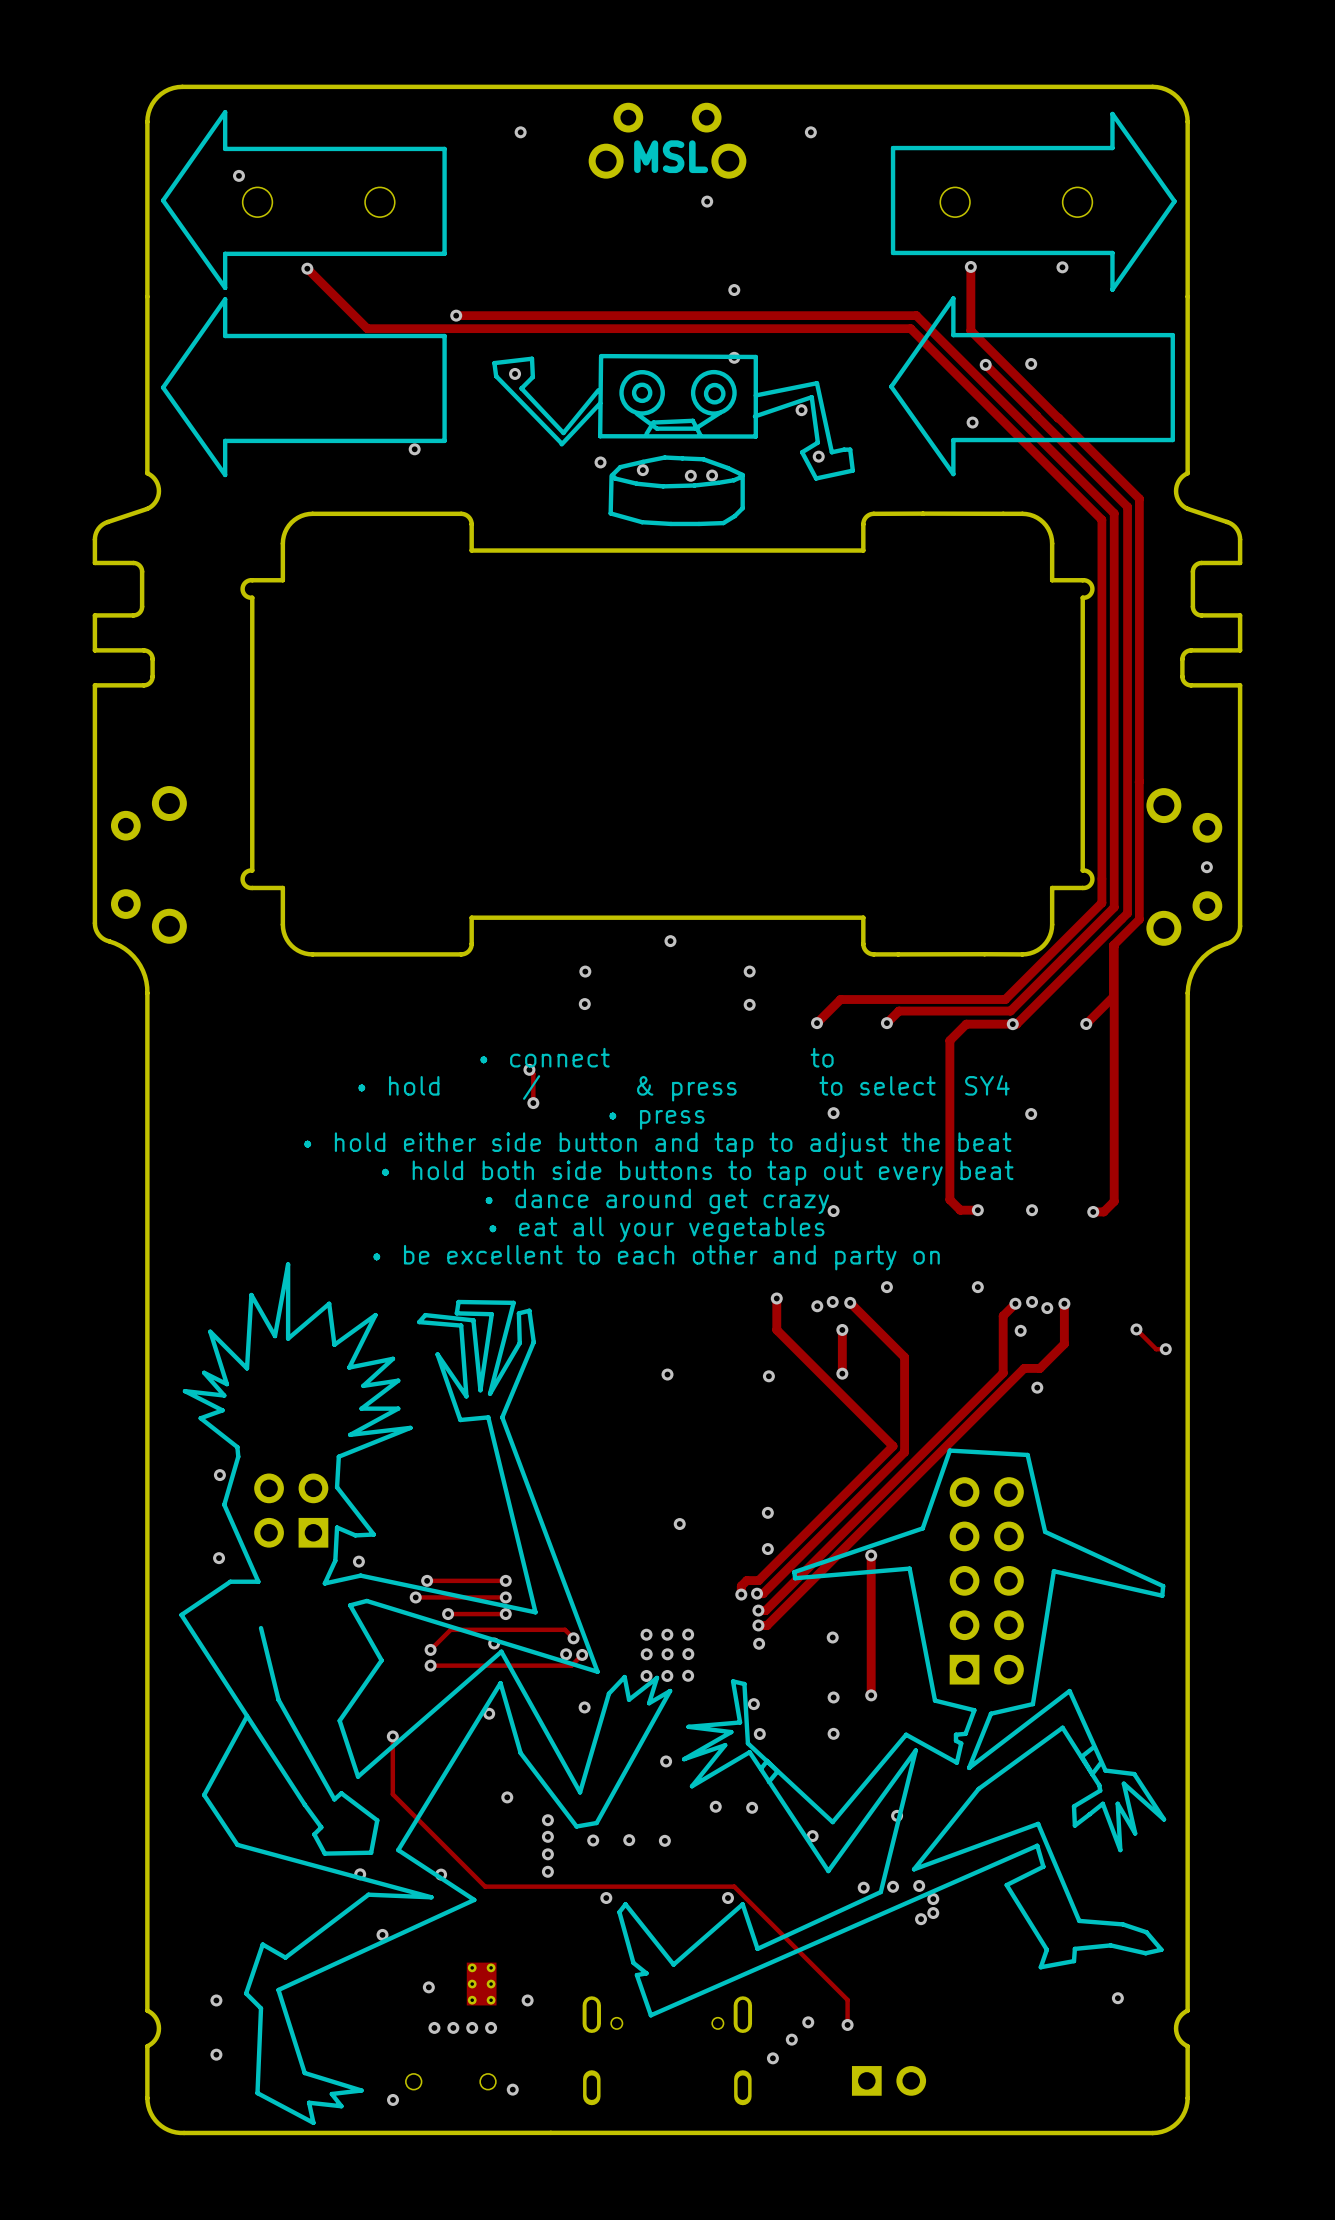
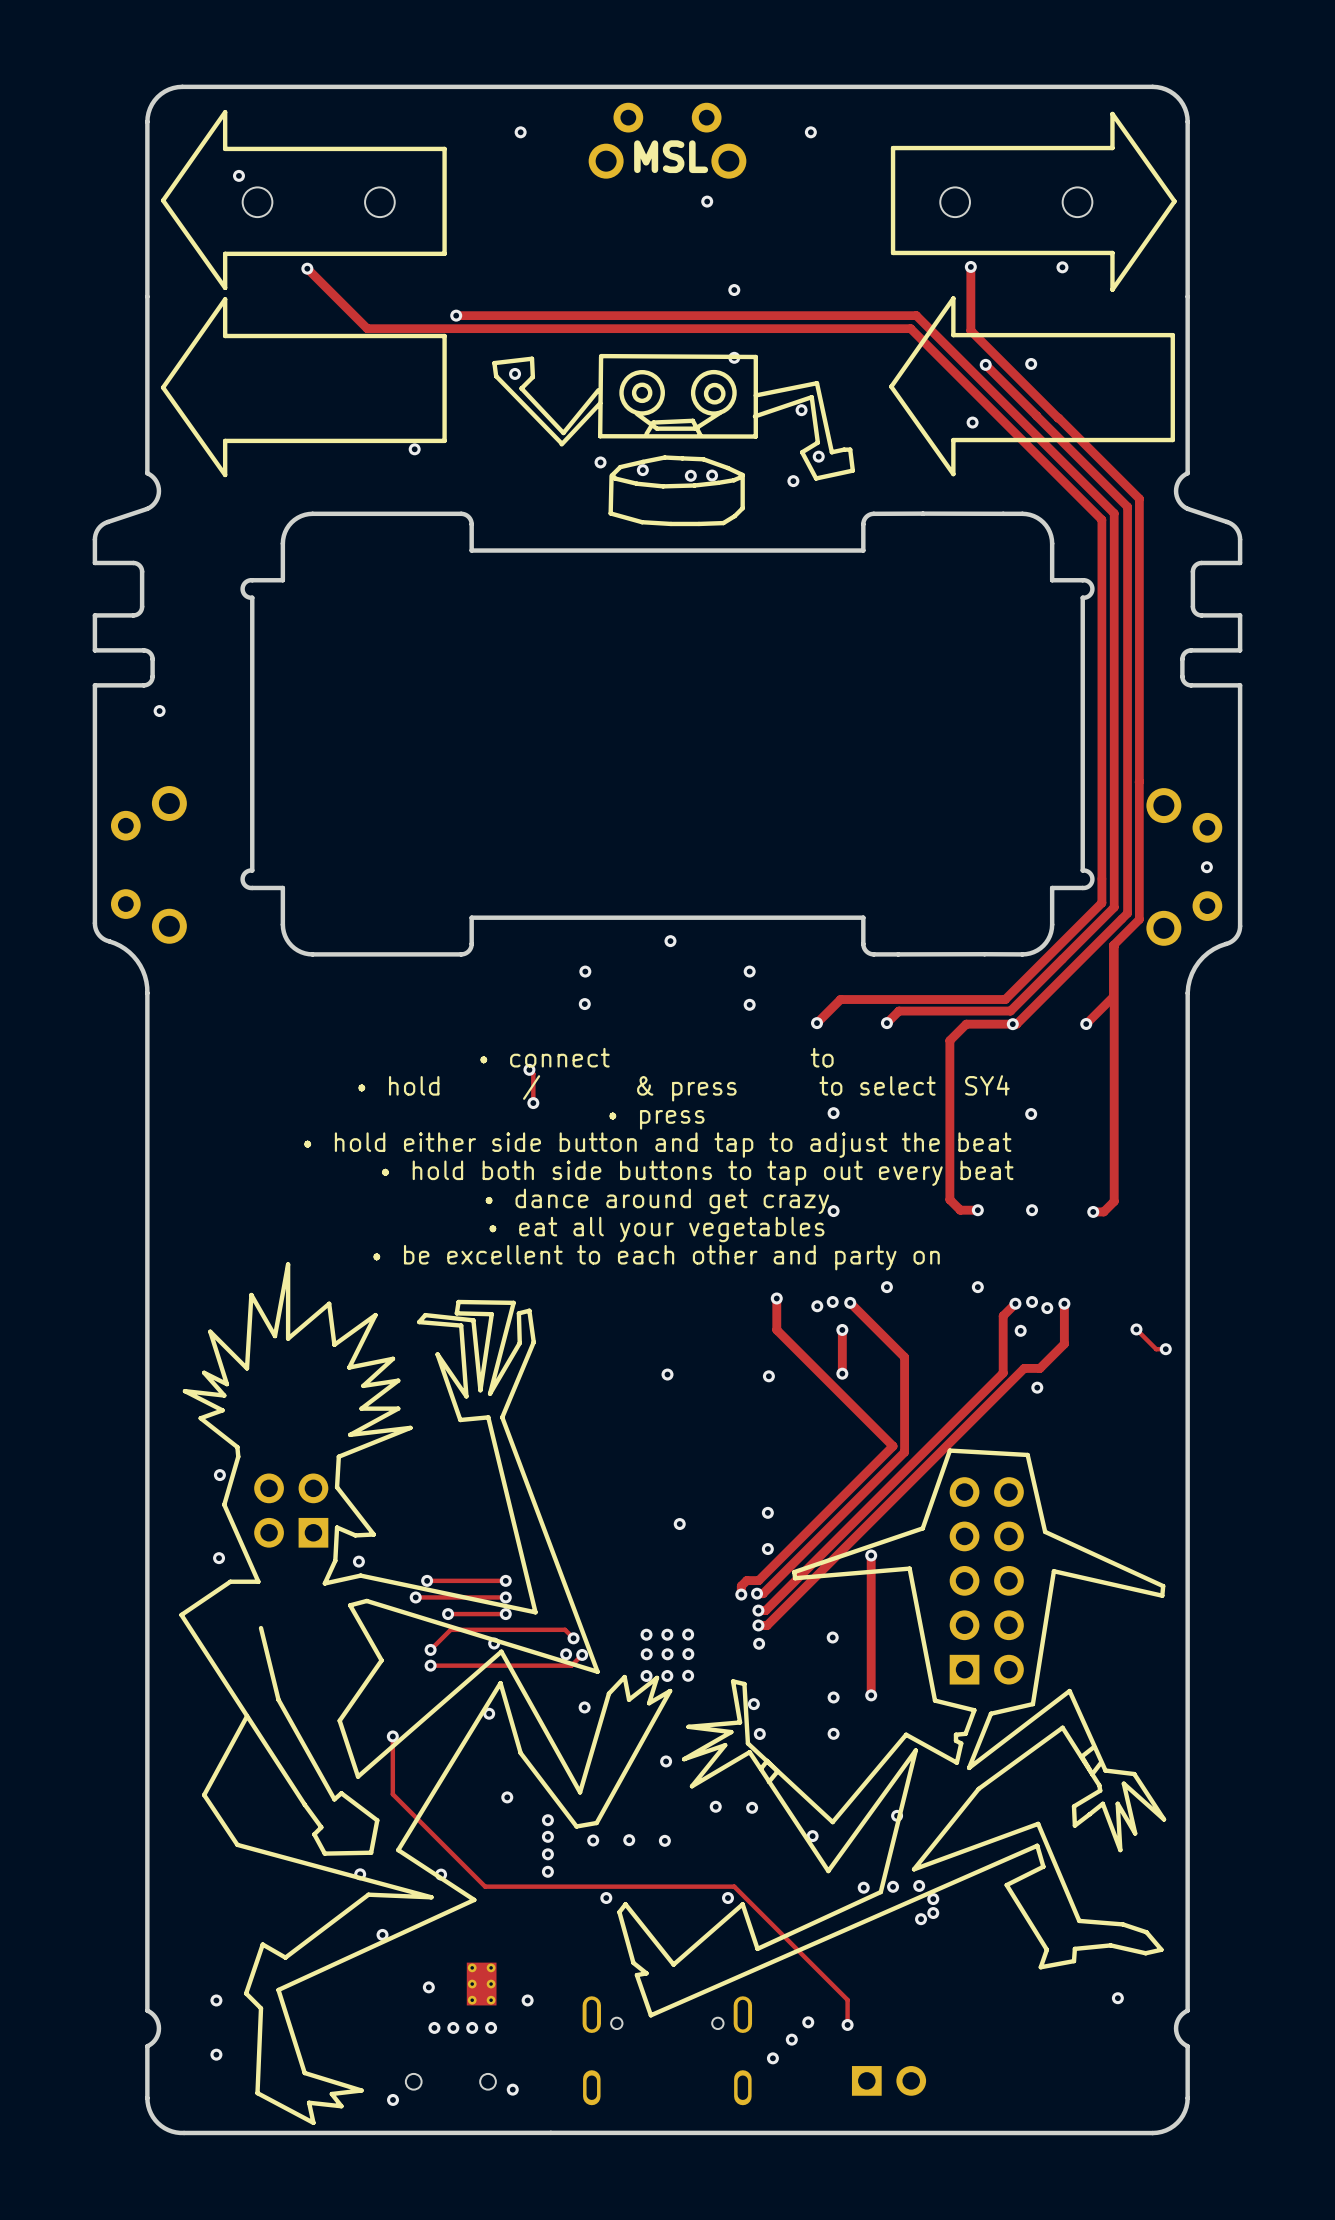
via: none -> (793, 481)
via: none -> (159, 711)

